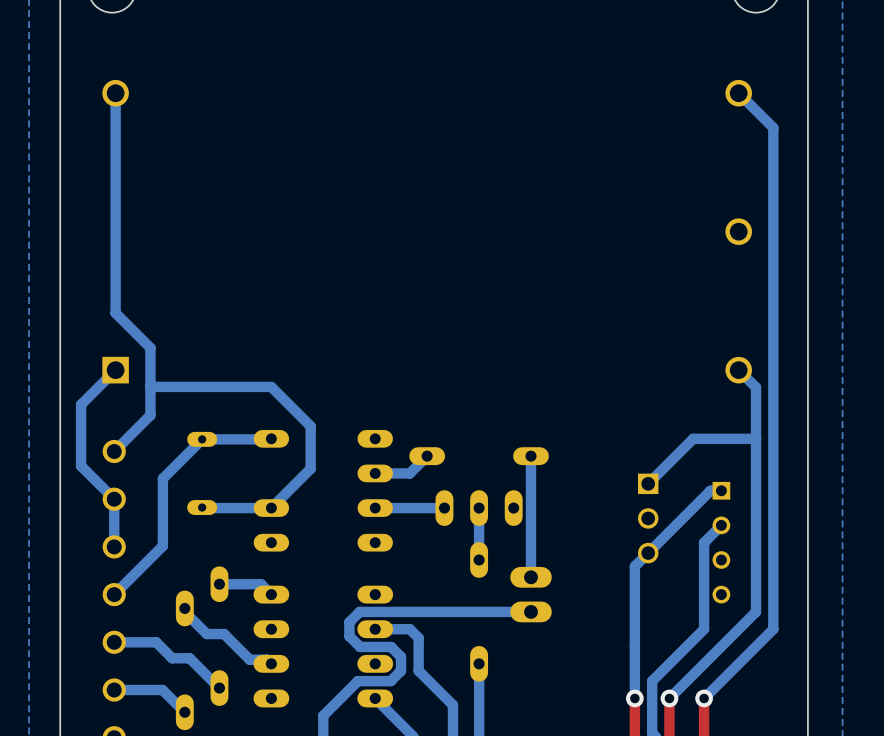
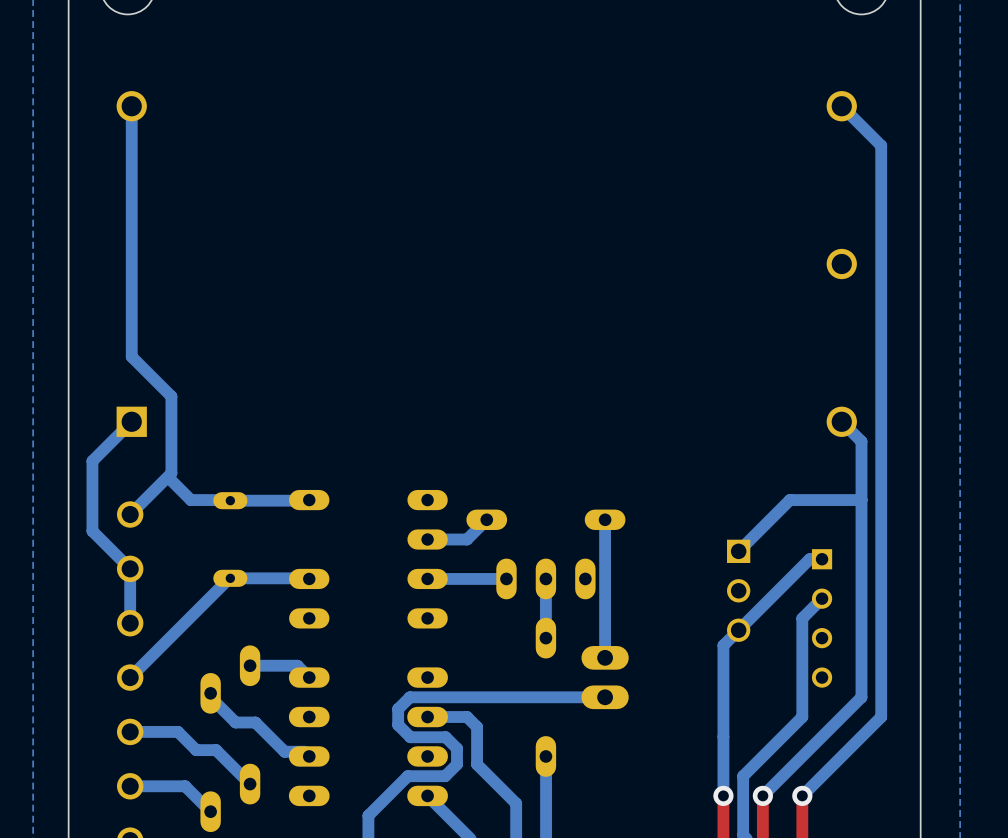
bottom track: (150, 386) (271, 386) (310, 426) (310, 468) (271, 508) (202, 507) -> none
bottom track: none -> (171, 480) (190, 500) (230, 500)
bottom track: (202, 439) (162, 478) (162, 545) -> (309, 578) (229, 578) (185, 622)

